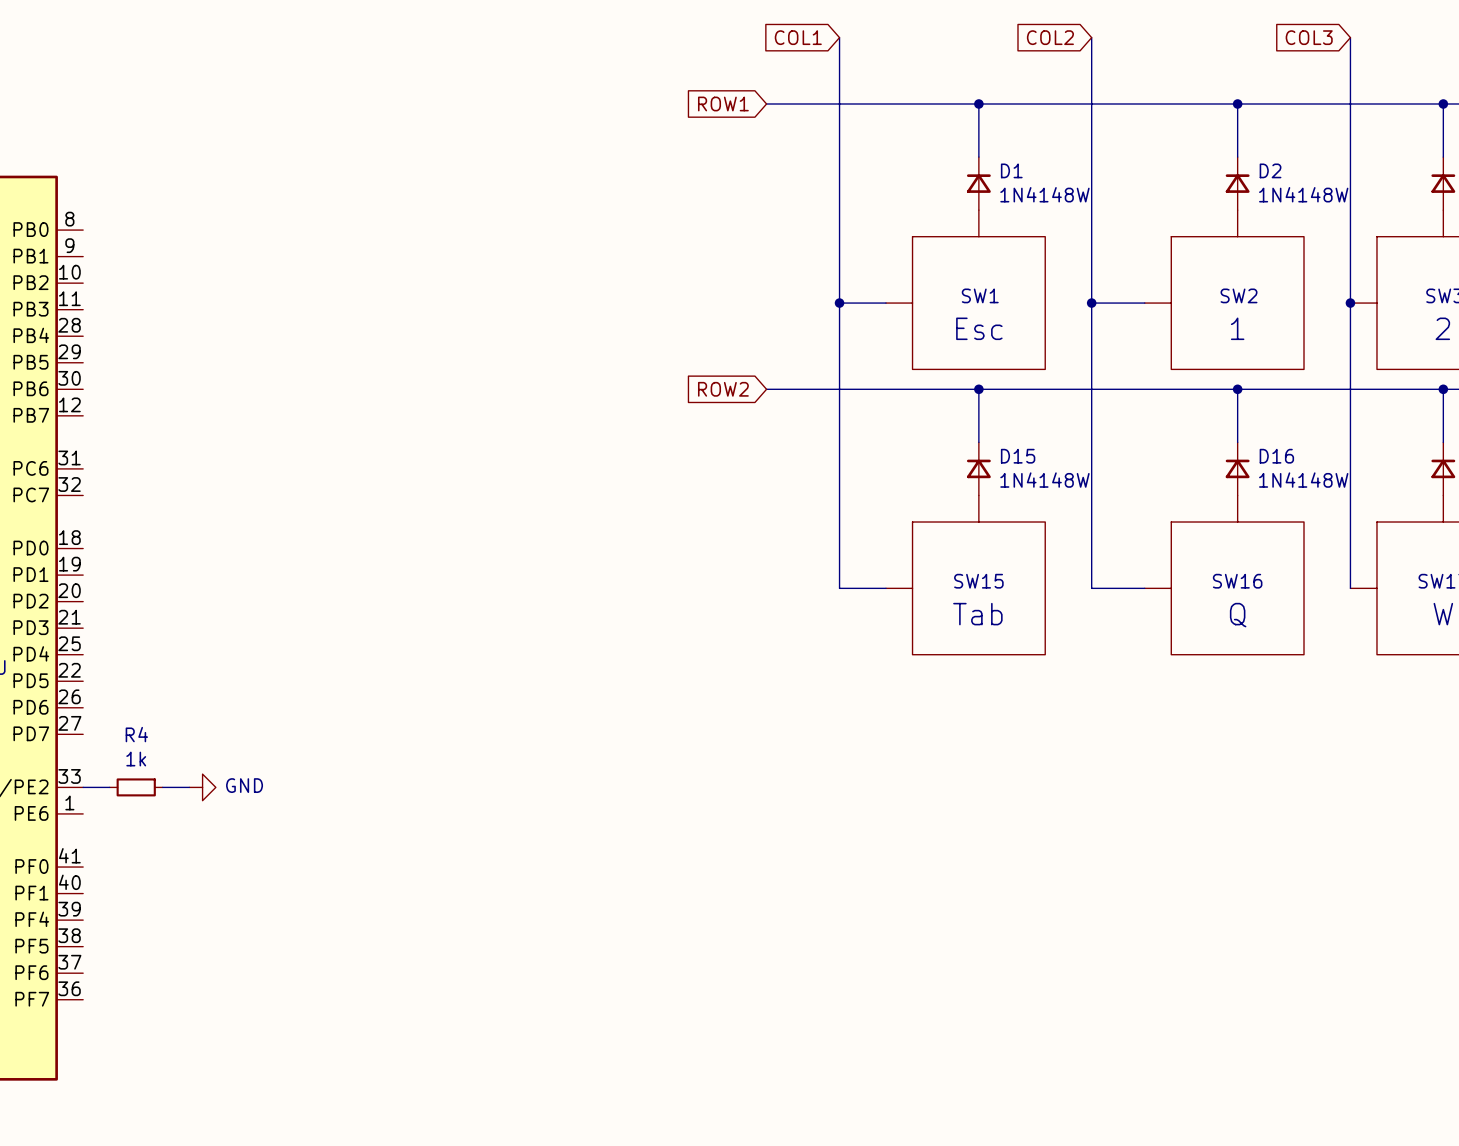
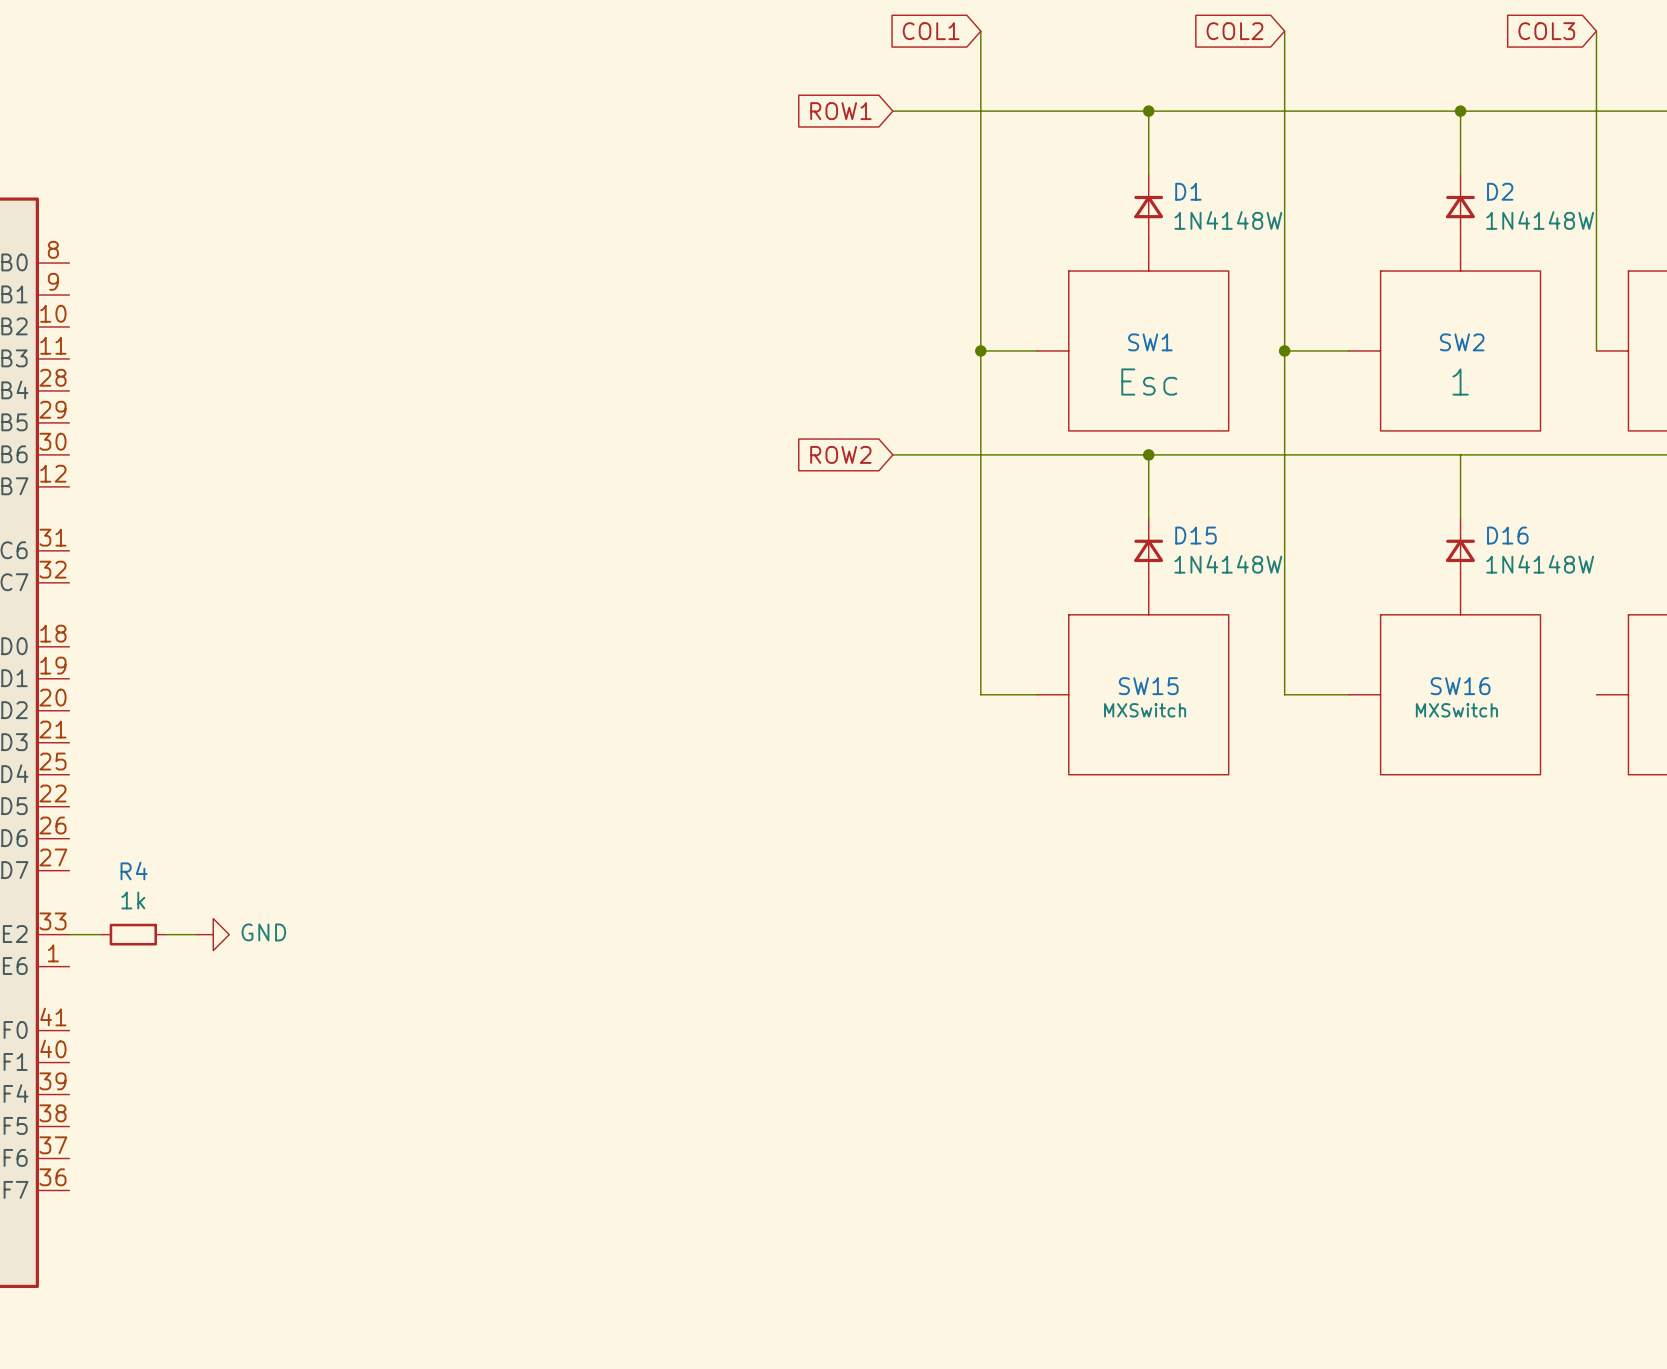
wire: (1350, 303) (1350, 588) -> none
junction: (1350, 303) -> none
junction: (1237, 389) -> none
SW15 value: Tab (977, 614) -> MXSwitch (1145, 710)
SW16 value: Q (1238, 615) -> MXSwitch (1456, 710)

